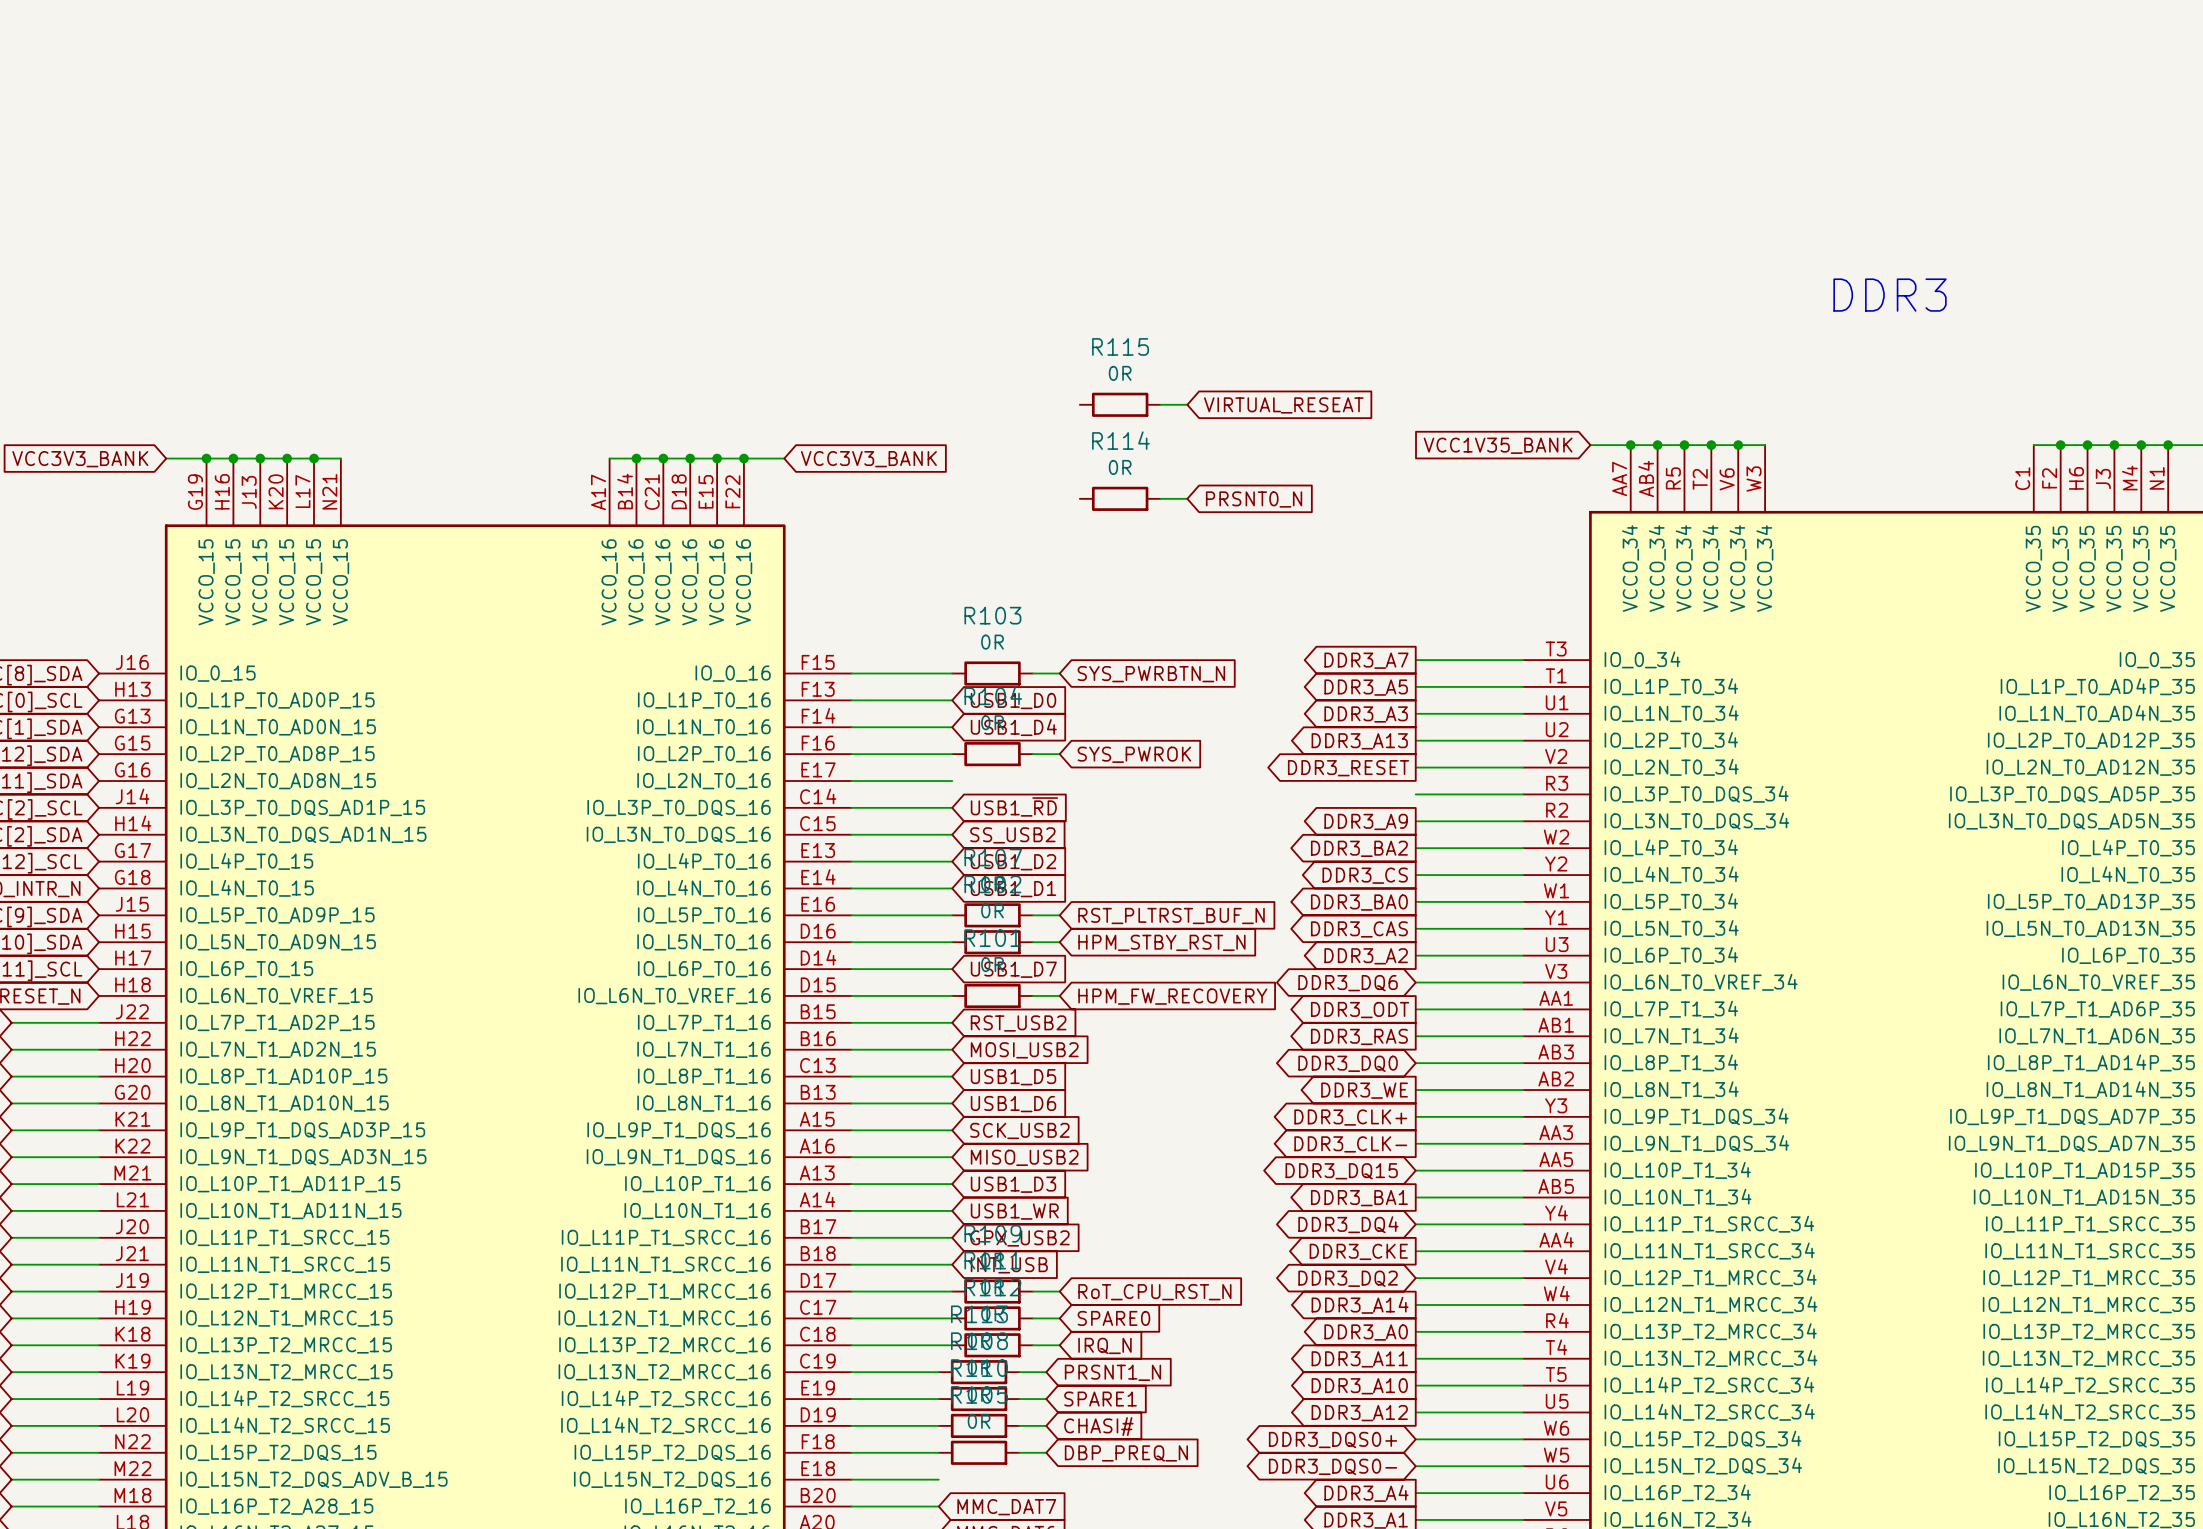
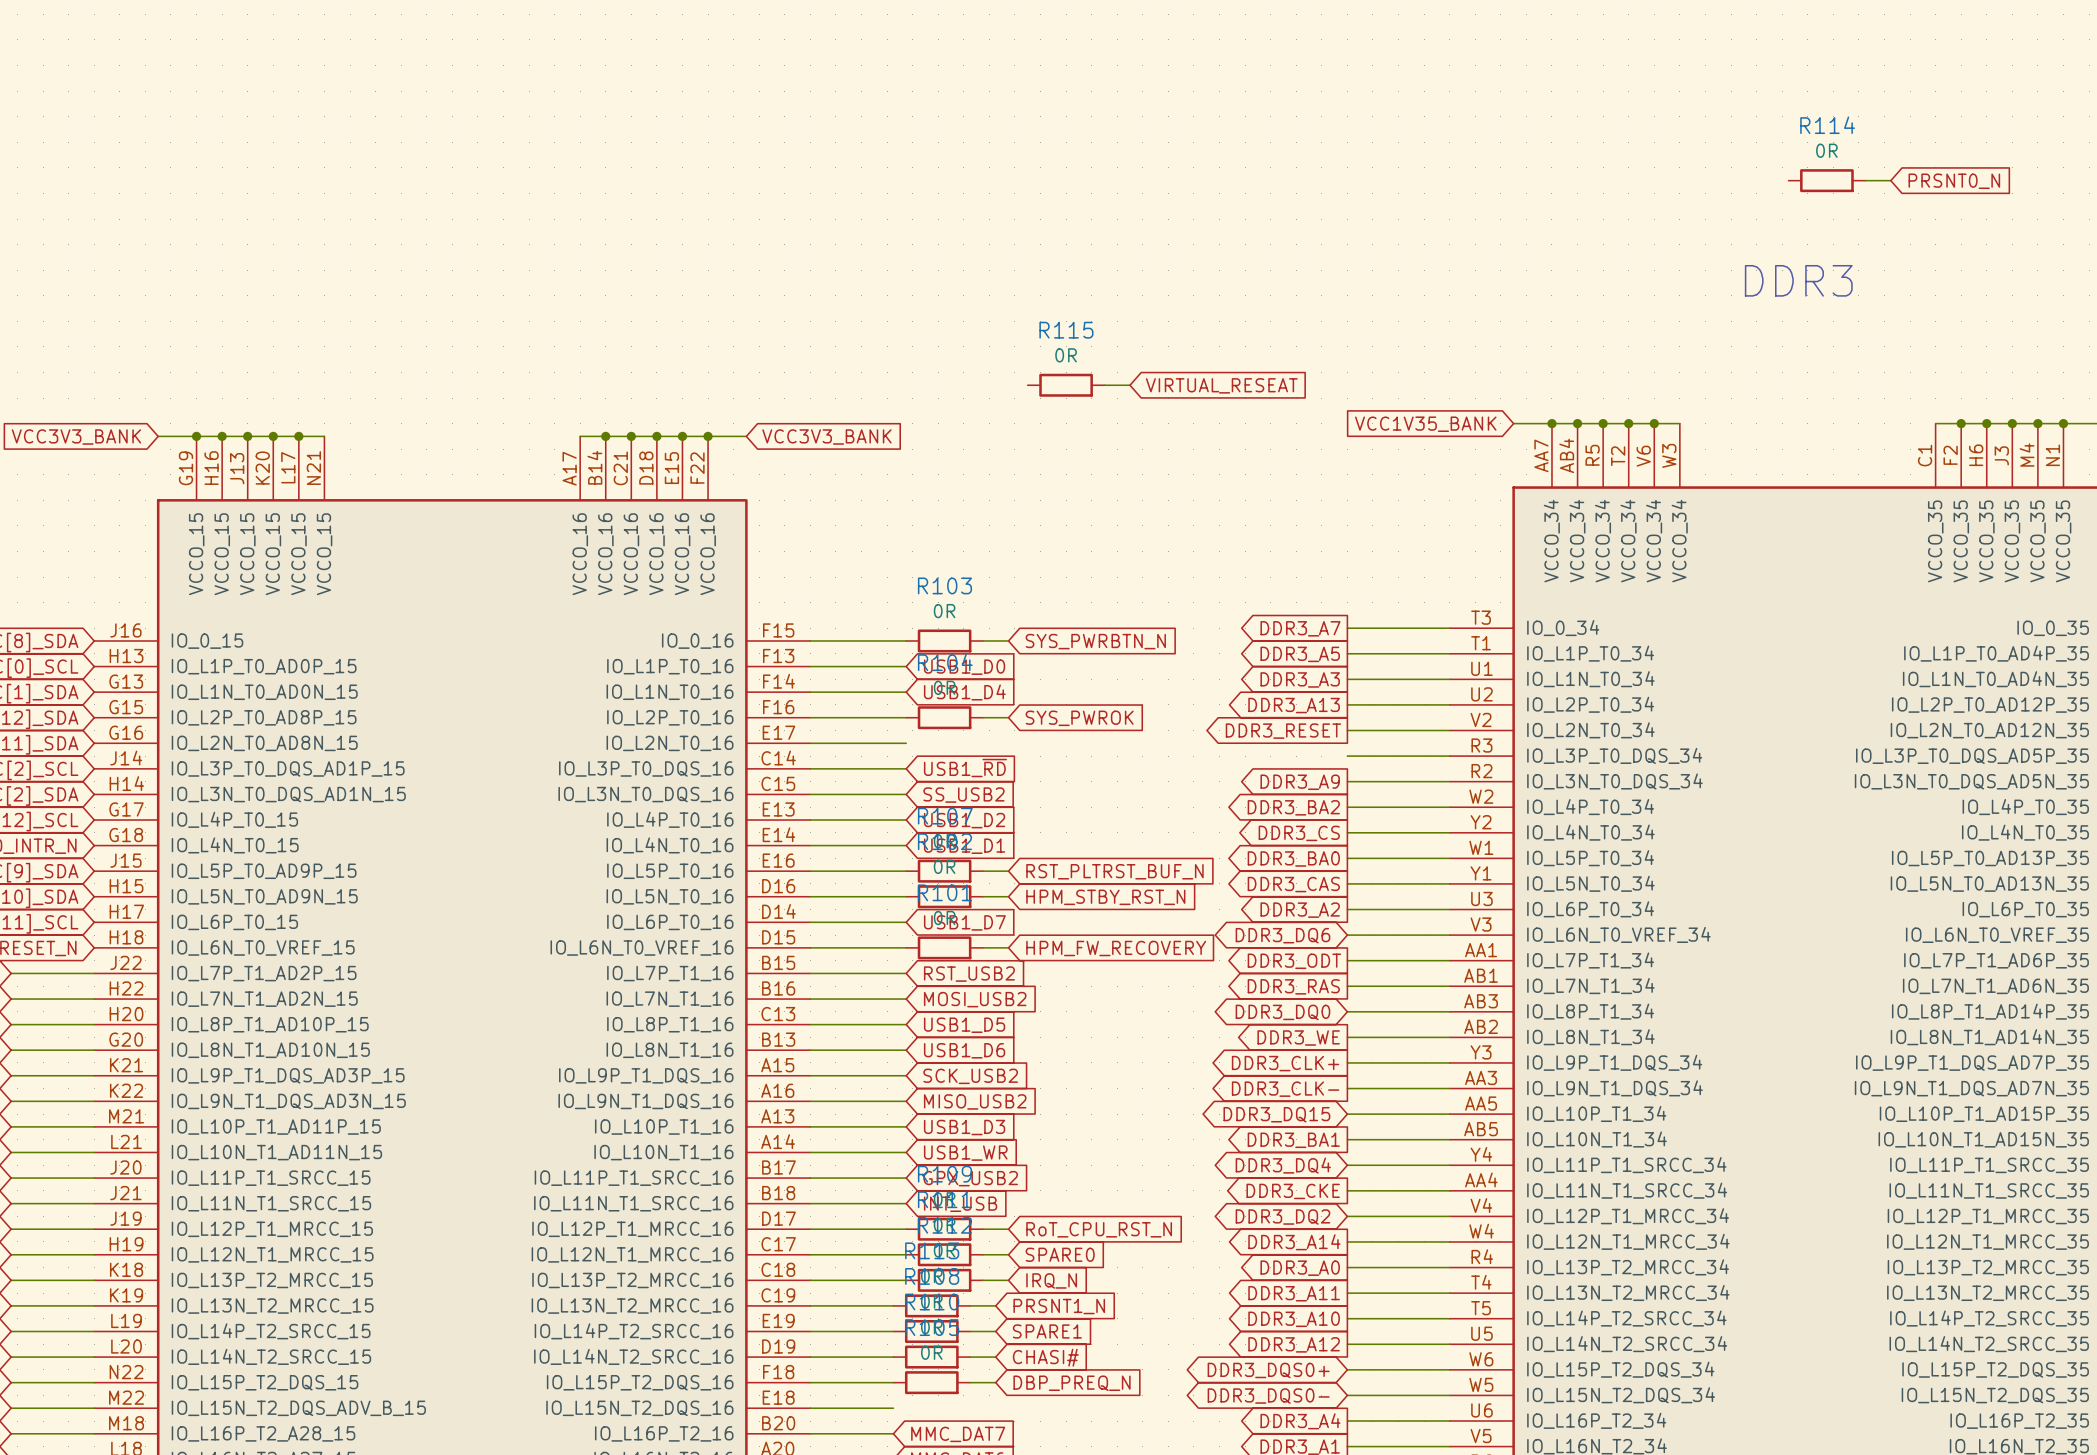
wire: none -> (1865, 180) (1890, 180)
global label: none -> PRSNT0_N (1954, 181)
R114 position: (1120, 498) -> (1826, 180)
wire: (1160, 498) (1187, 498) -> none
global label: PRSNT0_N (1254, 499) -> none

